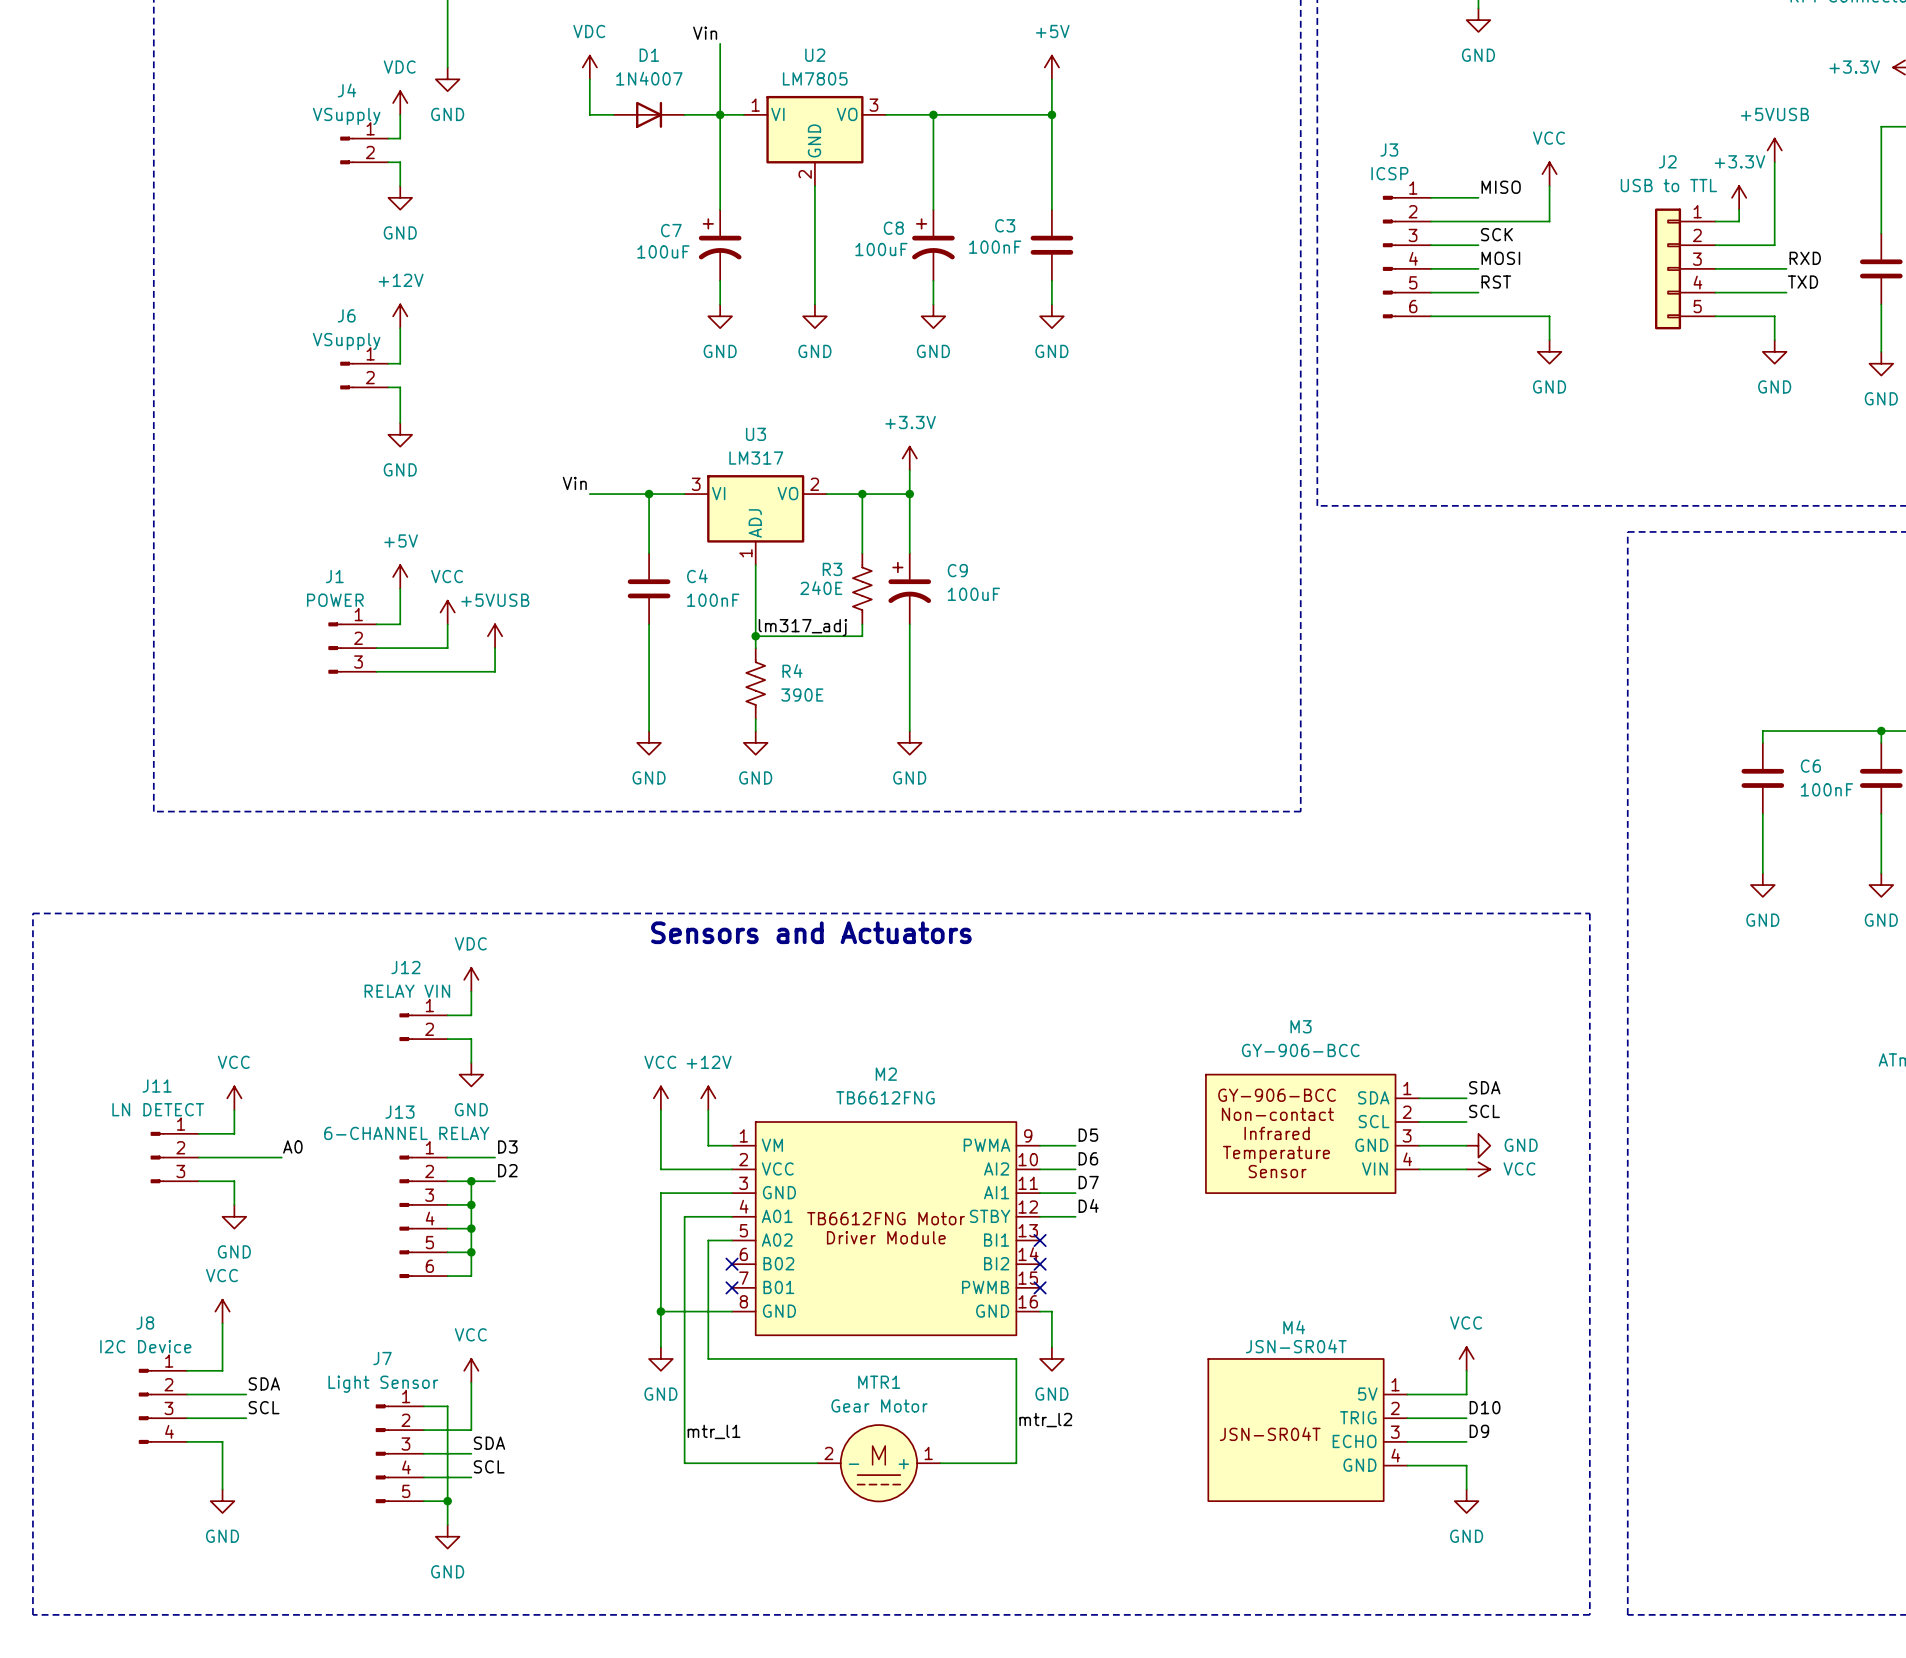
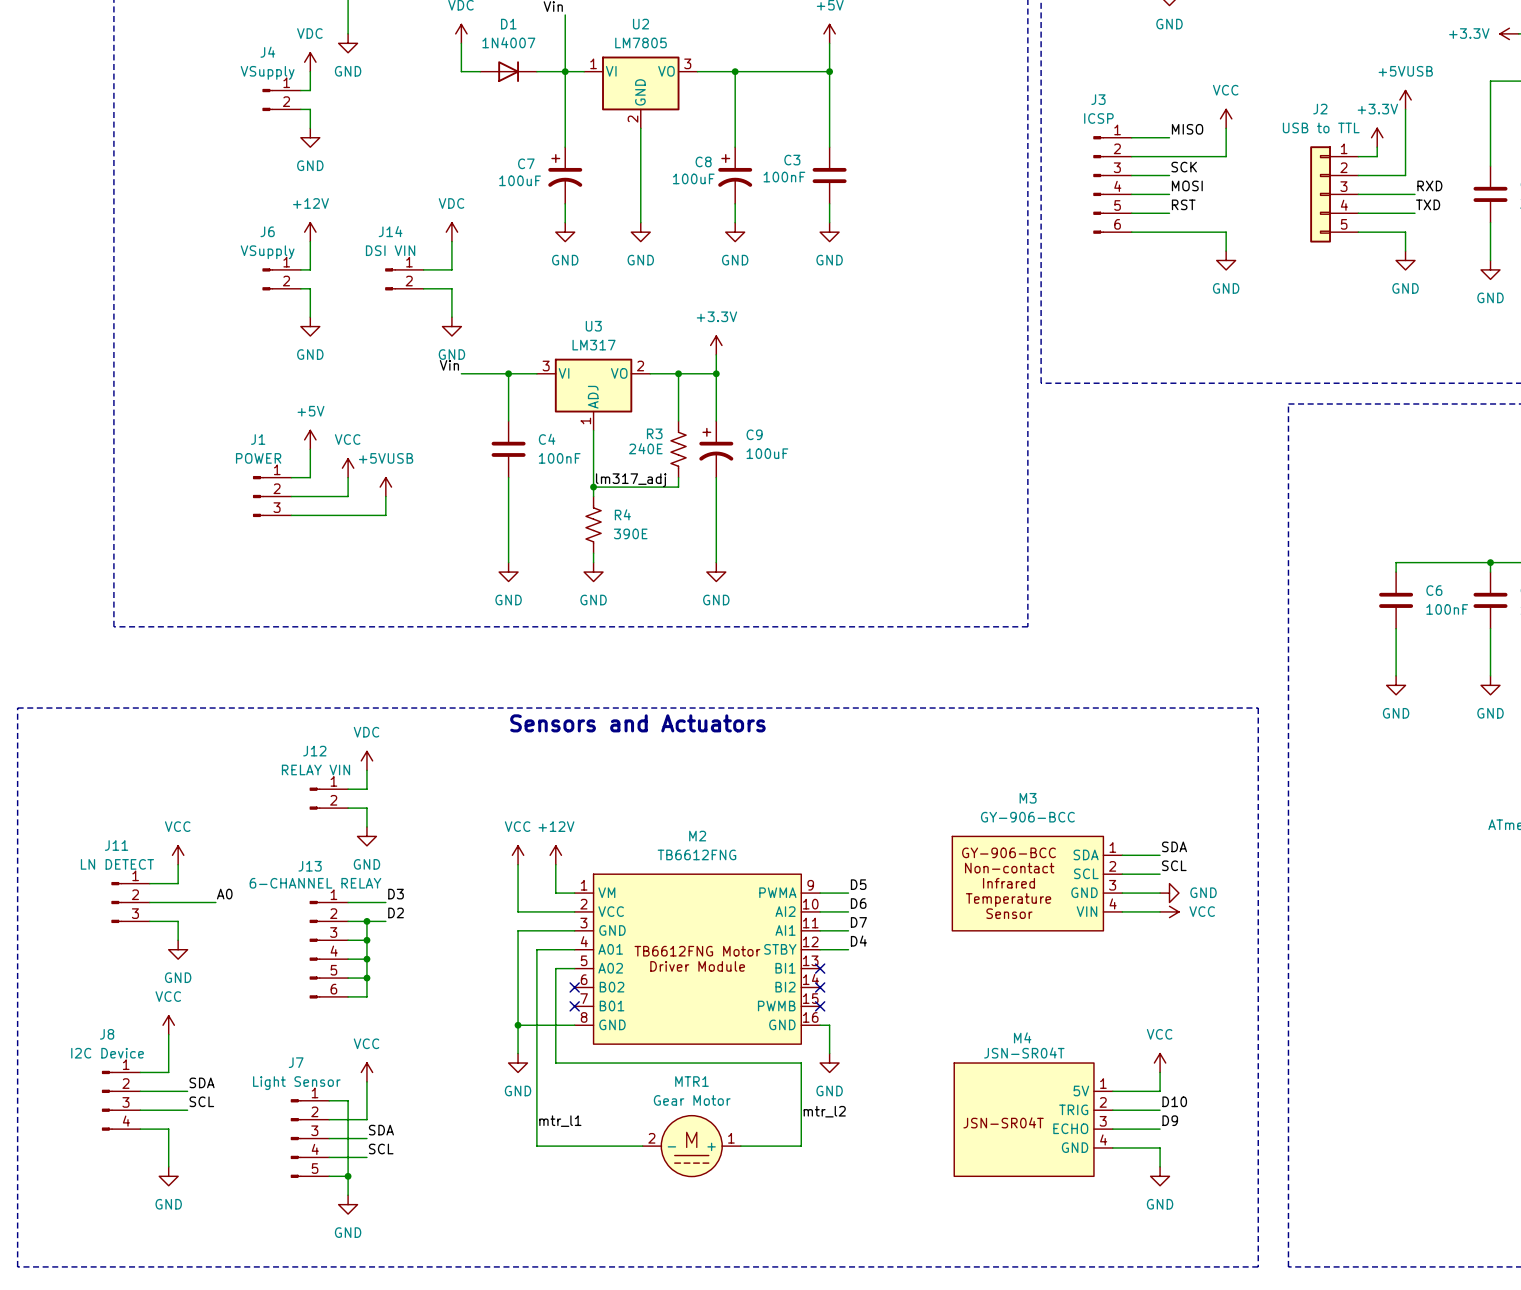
power symbol: none -> VDC (451, 232)
wire: none -> (451, 241) (451, 269) (423, 269)
J14: none -> DSI VIN (404, 279)
wire: none -> (423, 288) (451, 288) (451, 317)
power symbol: none -> GND (451, 326)

